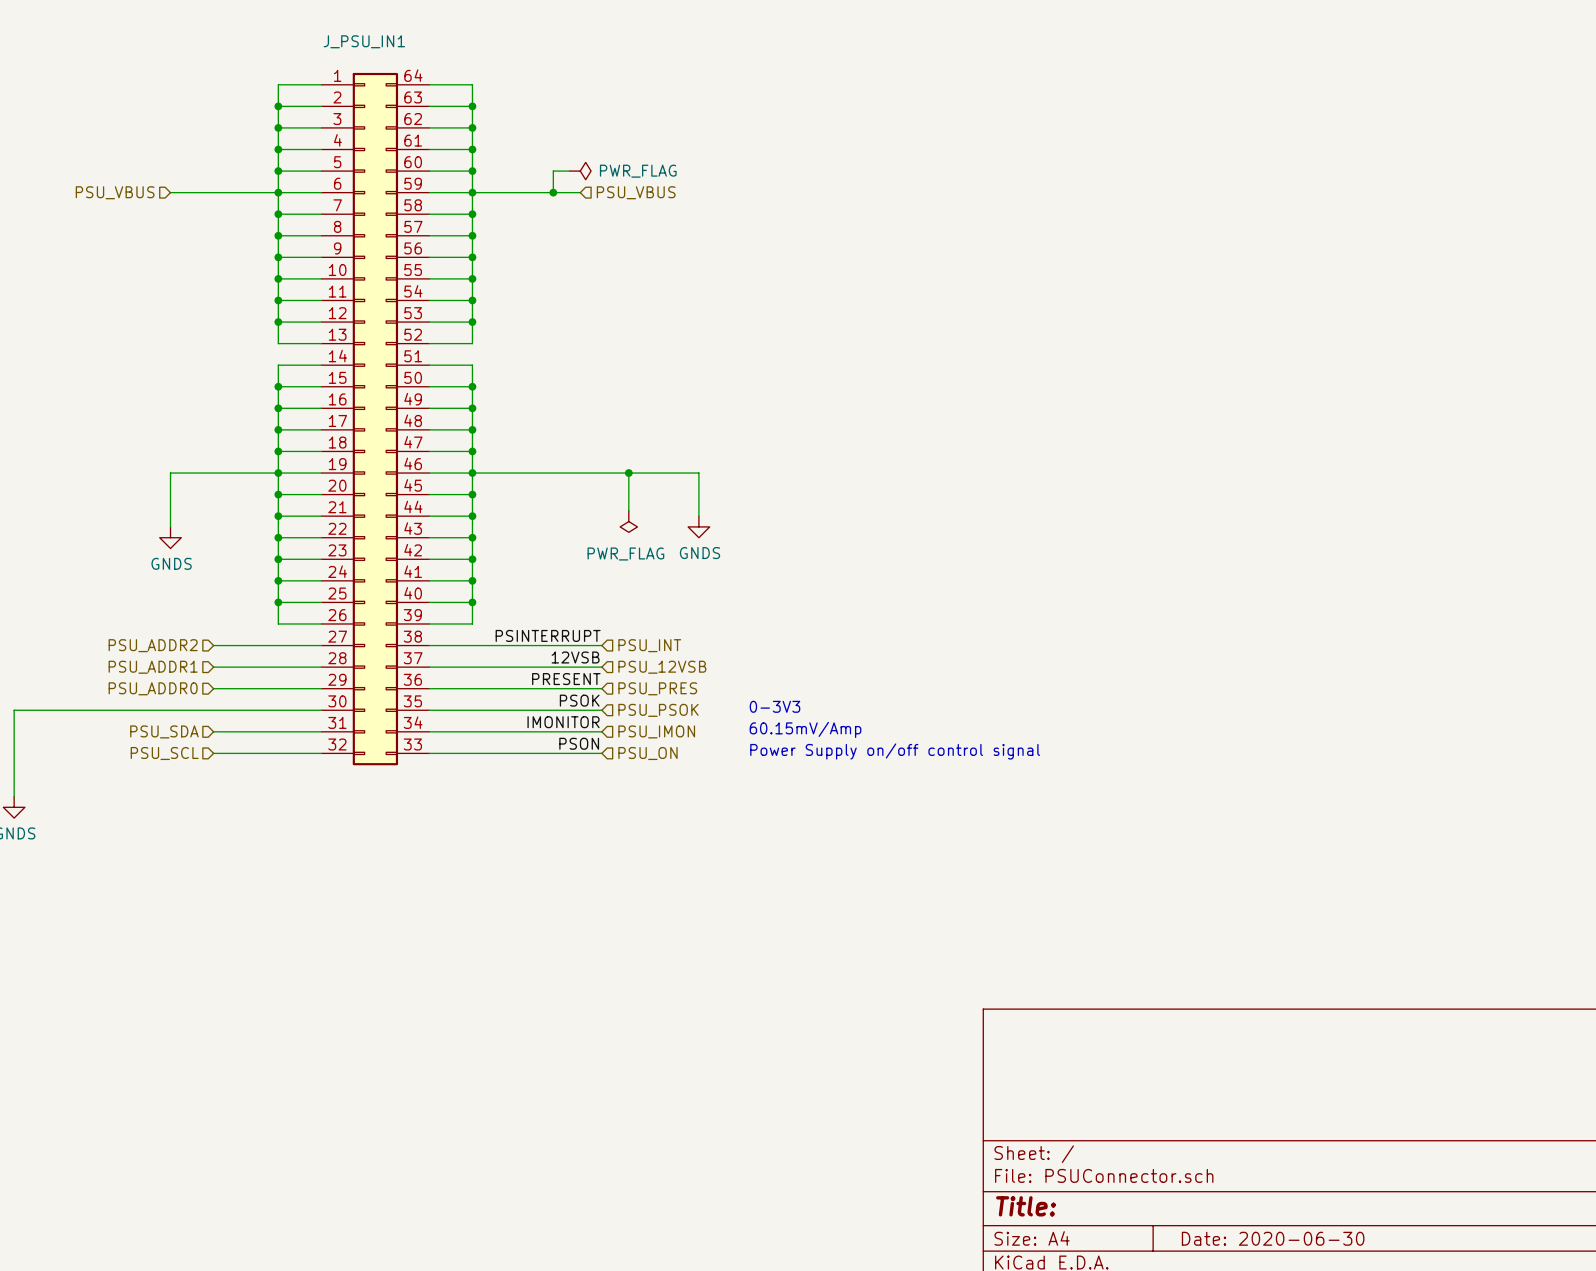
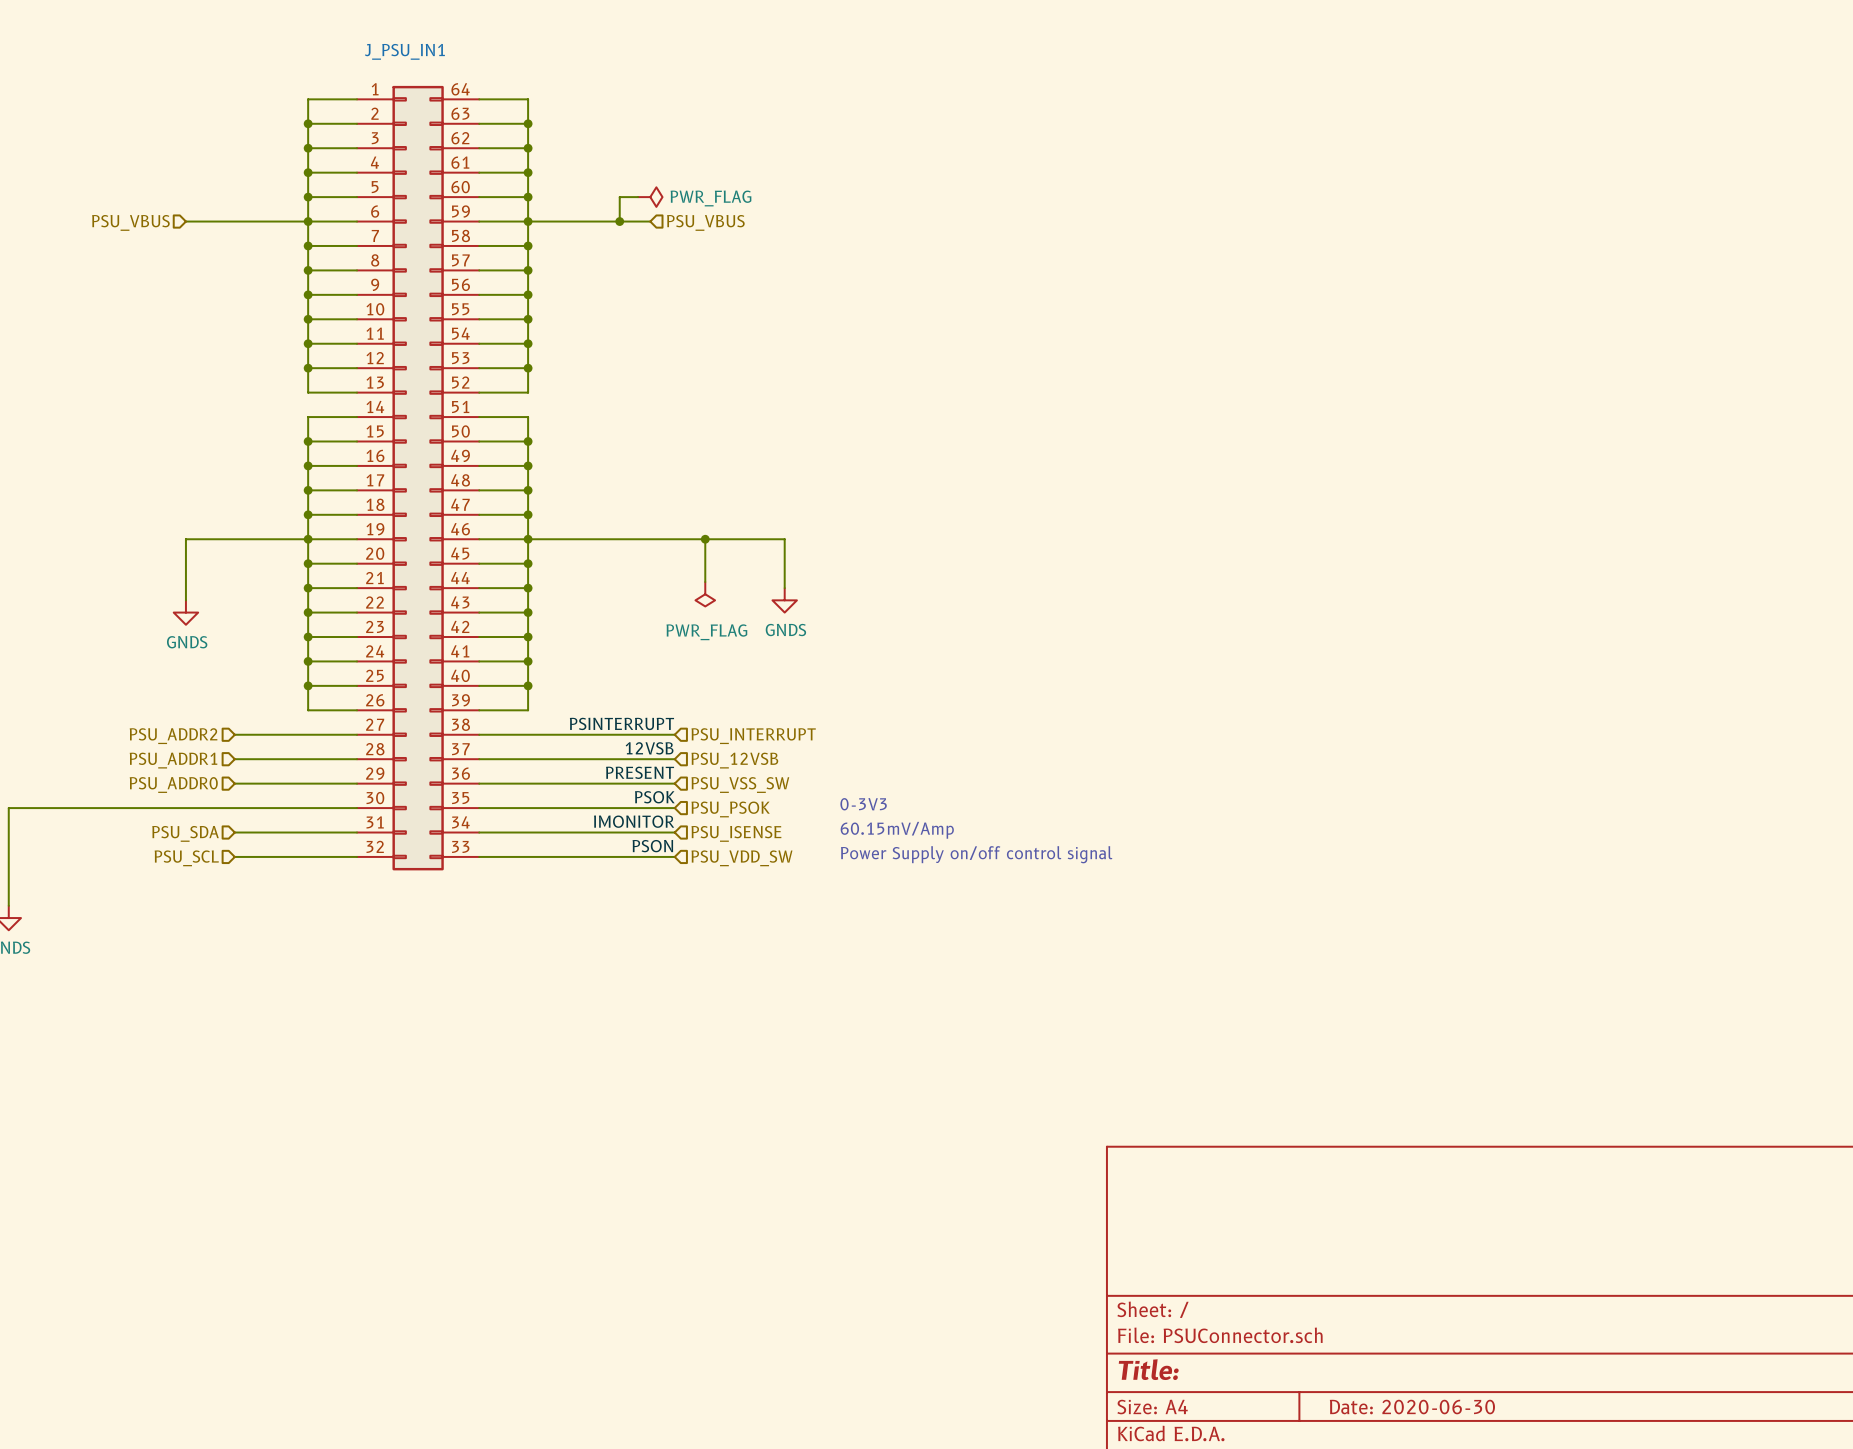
hierarchical label: PSU_INT (649, 645) -> PSU_INTERRUPT (753, 736)
hierarchical label: PSU_PRES (657, 688) -> PSU_VSS_SW (740, 785)
hierarchical label: PSU_IMON (656, 731) -> PSU_ISENSE (736, 833)
hierarchical label: PSU_ON (647, 753) -> PSU_VDD_SW (741, 858)

